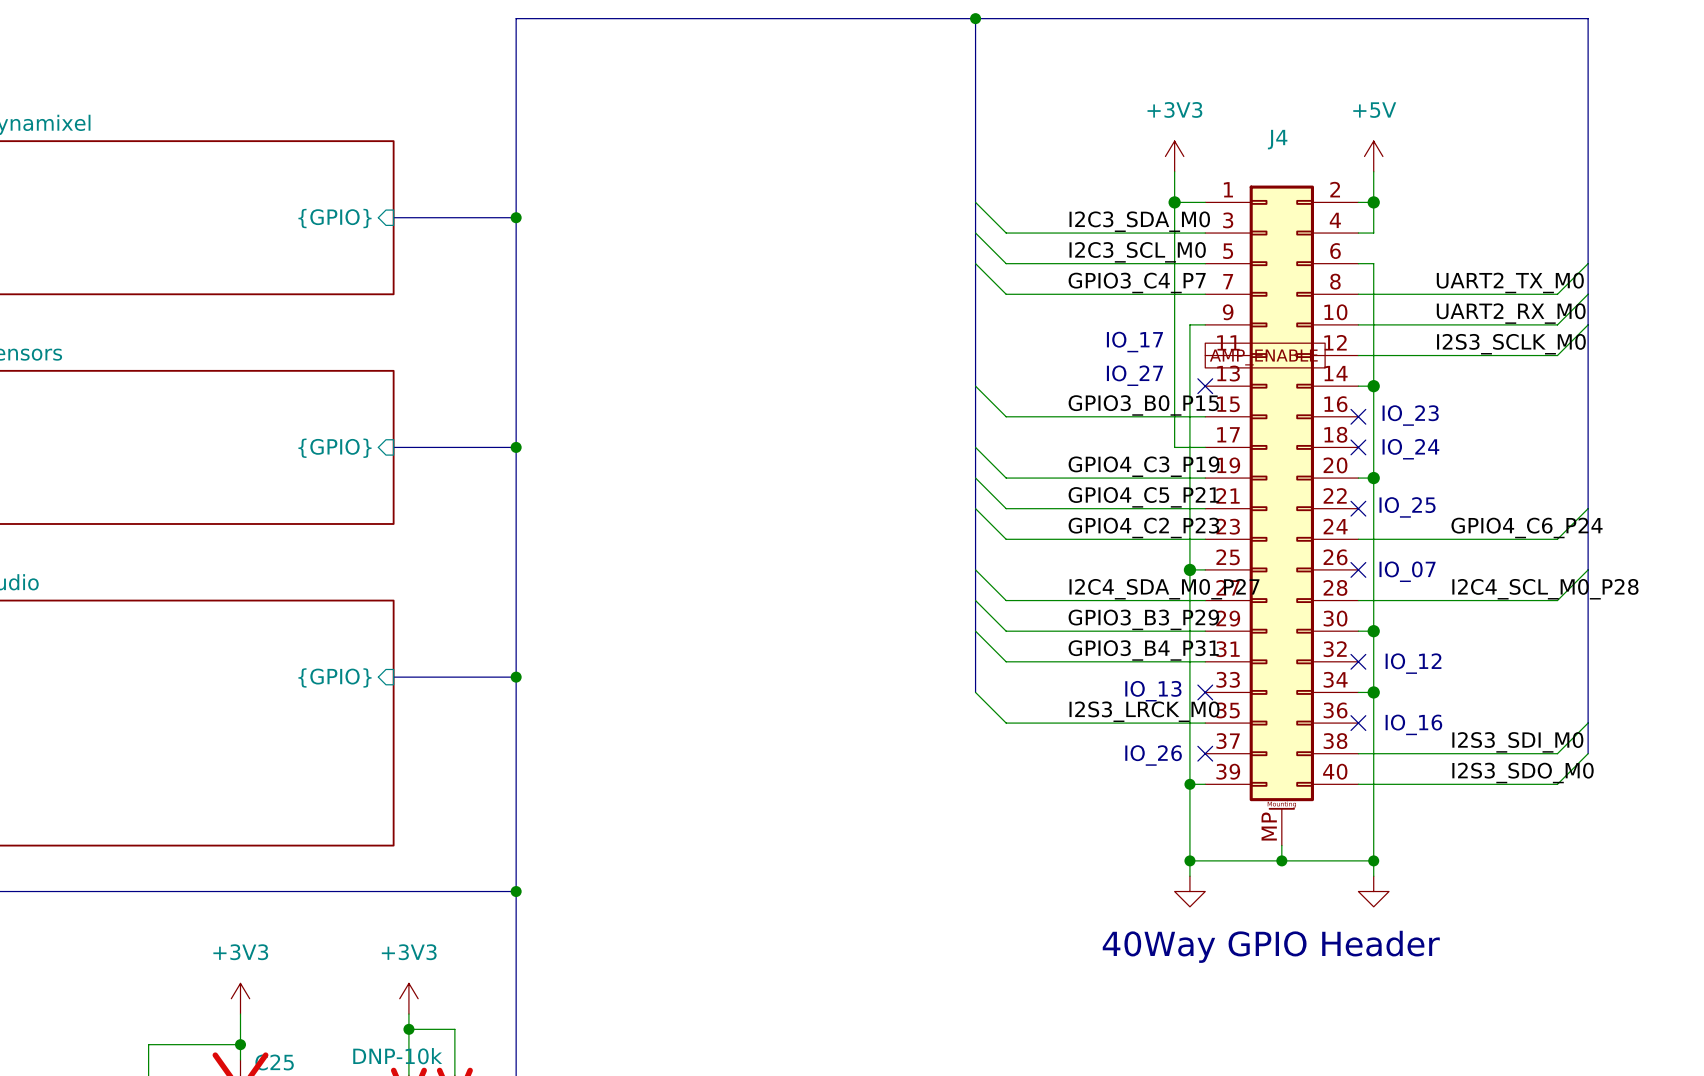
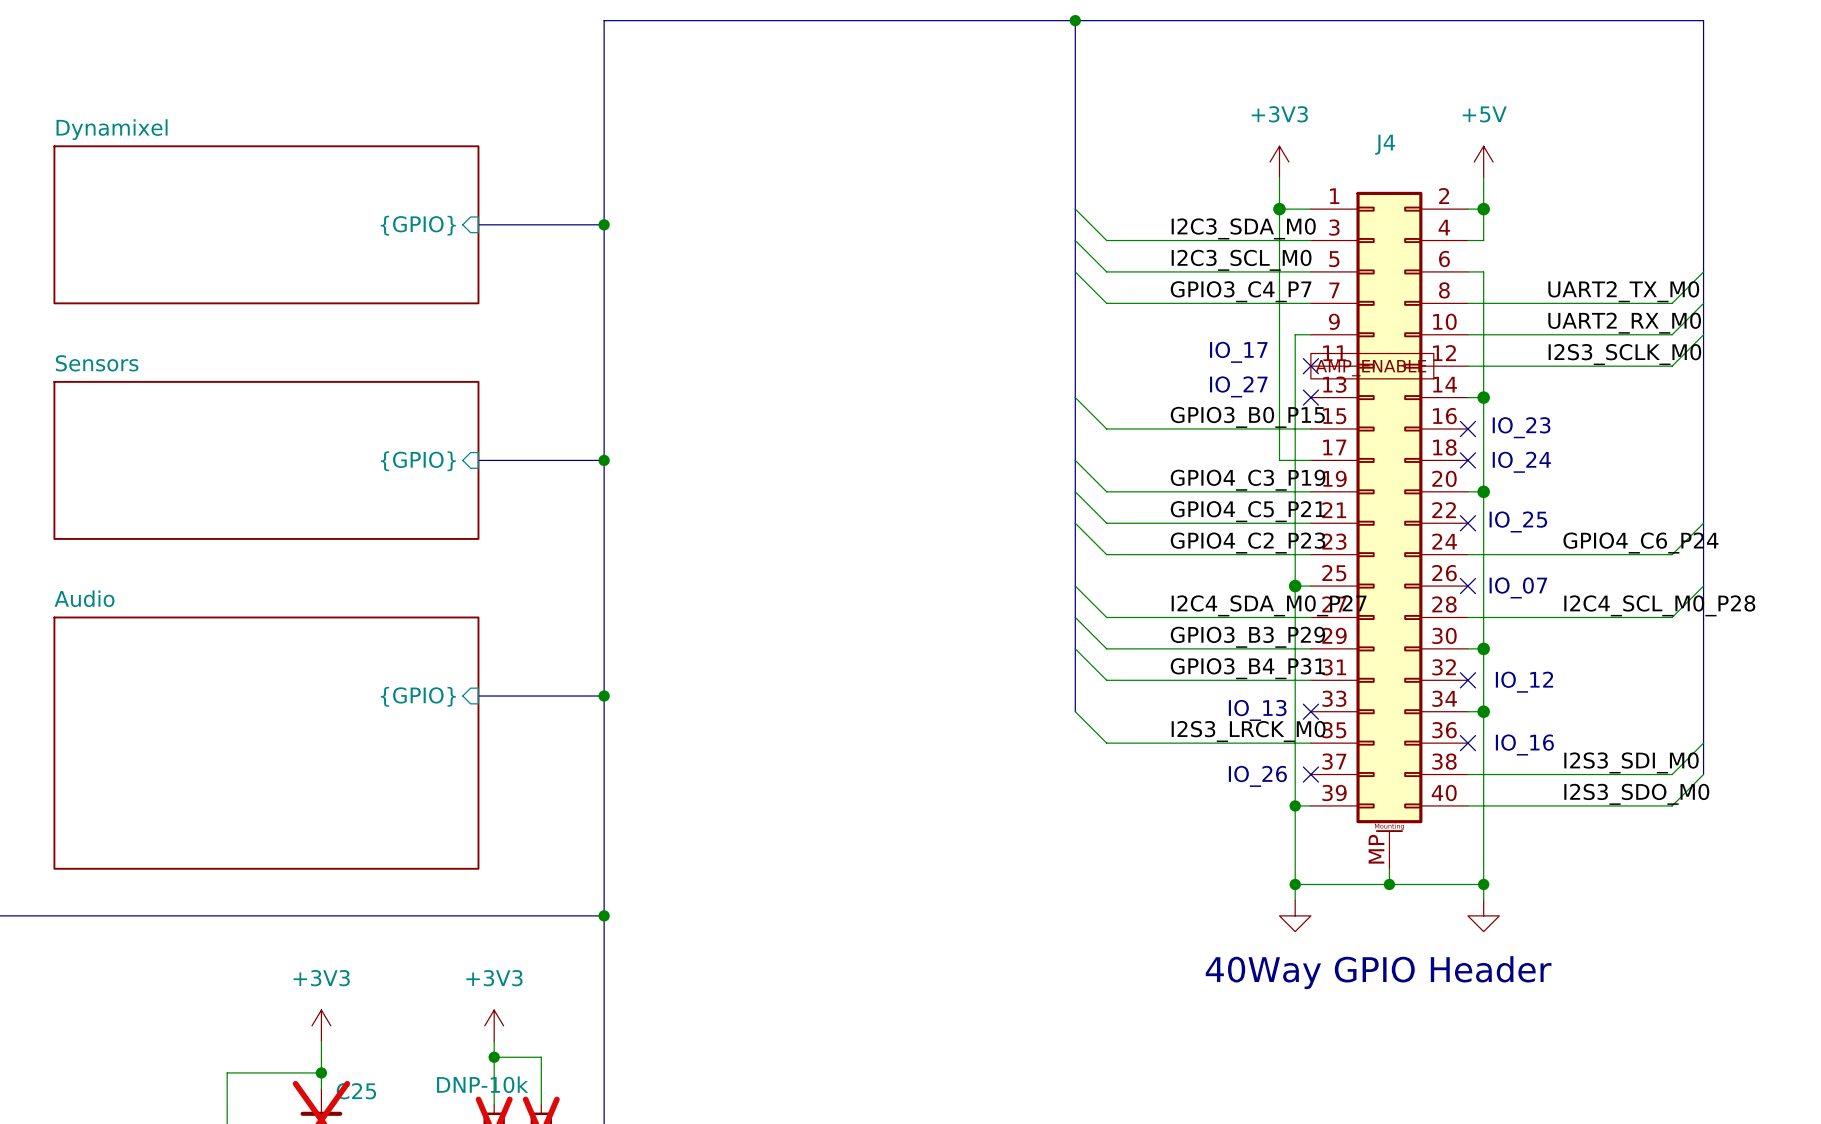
no-connect mark: none -> (1310, 366)

